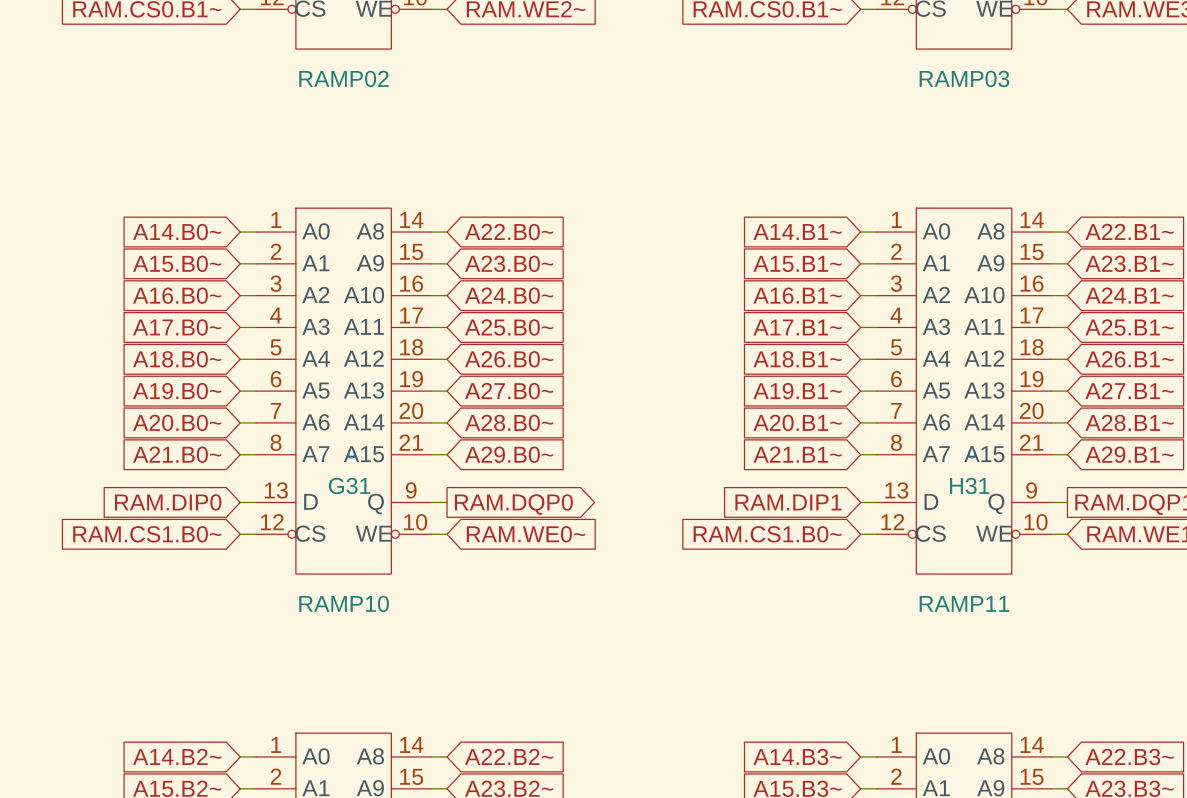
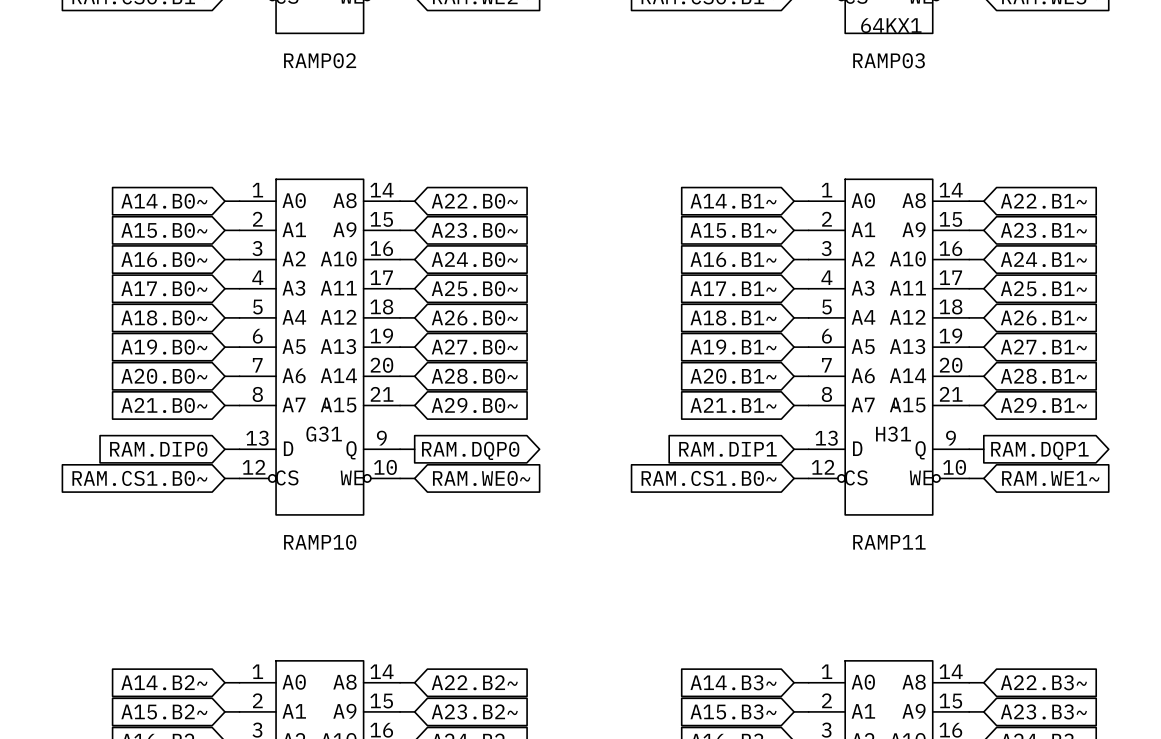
part value: none -> 64KX1 (891, 25)

